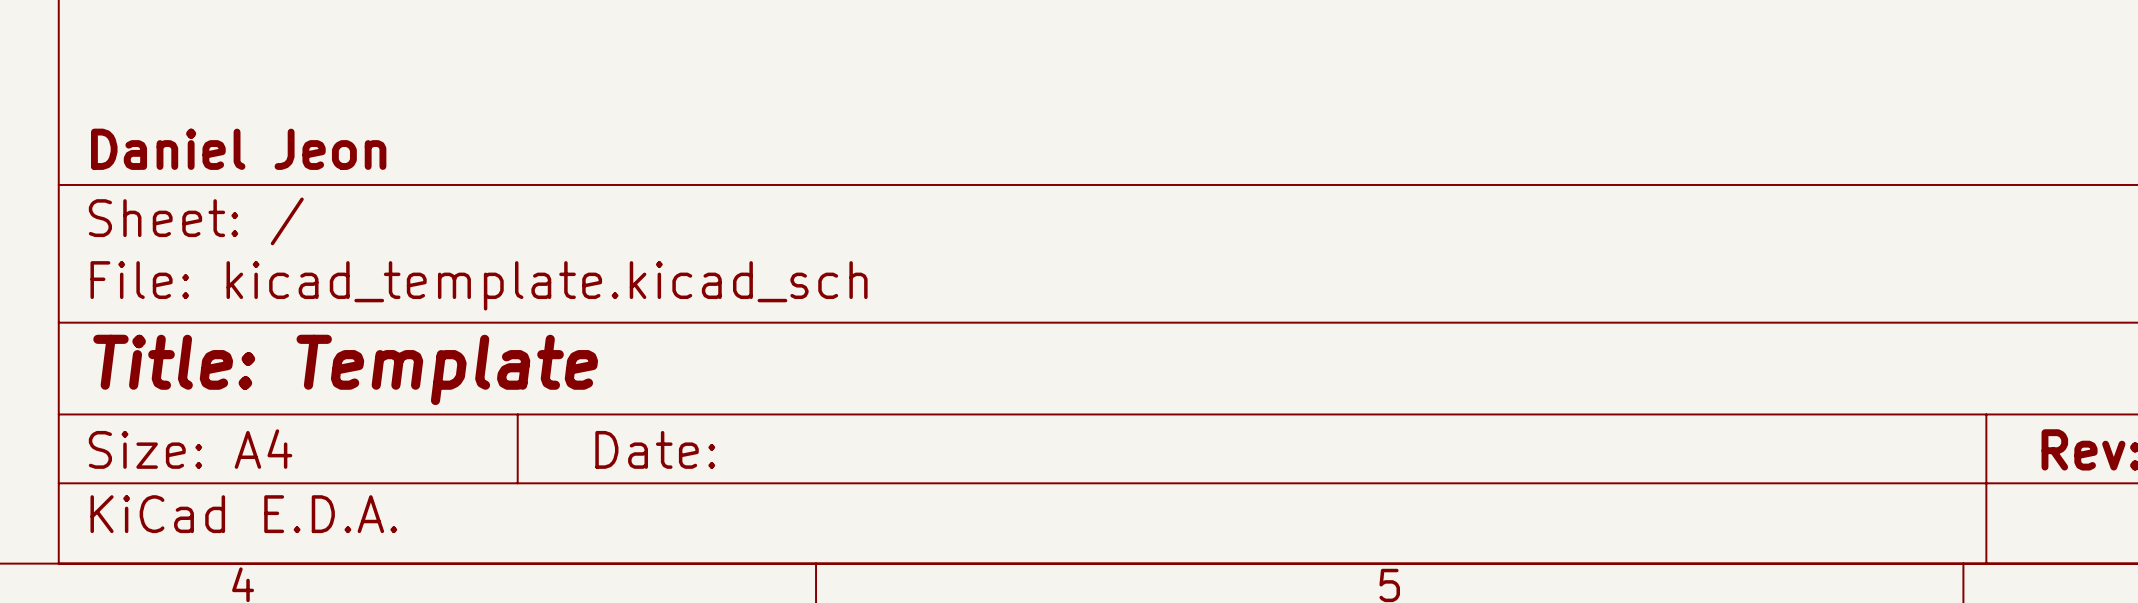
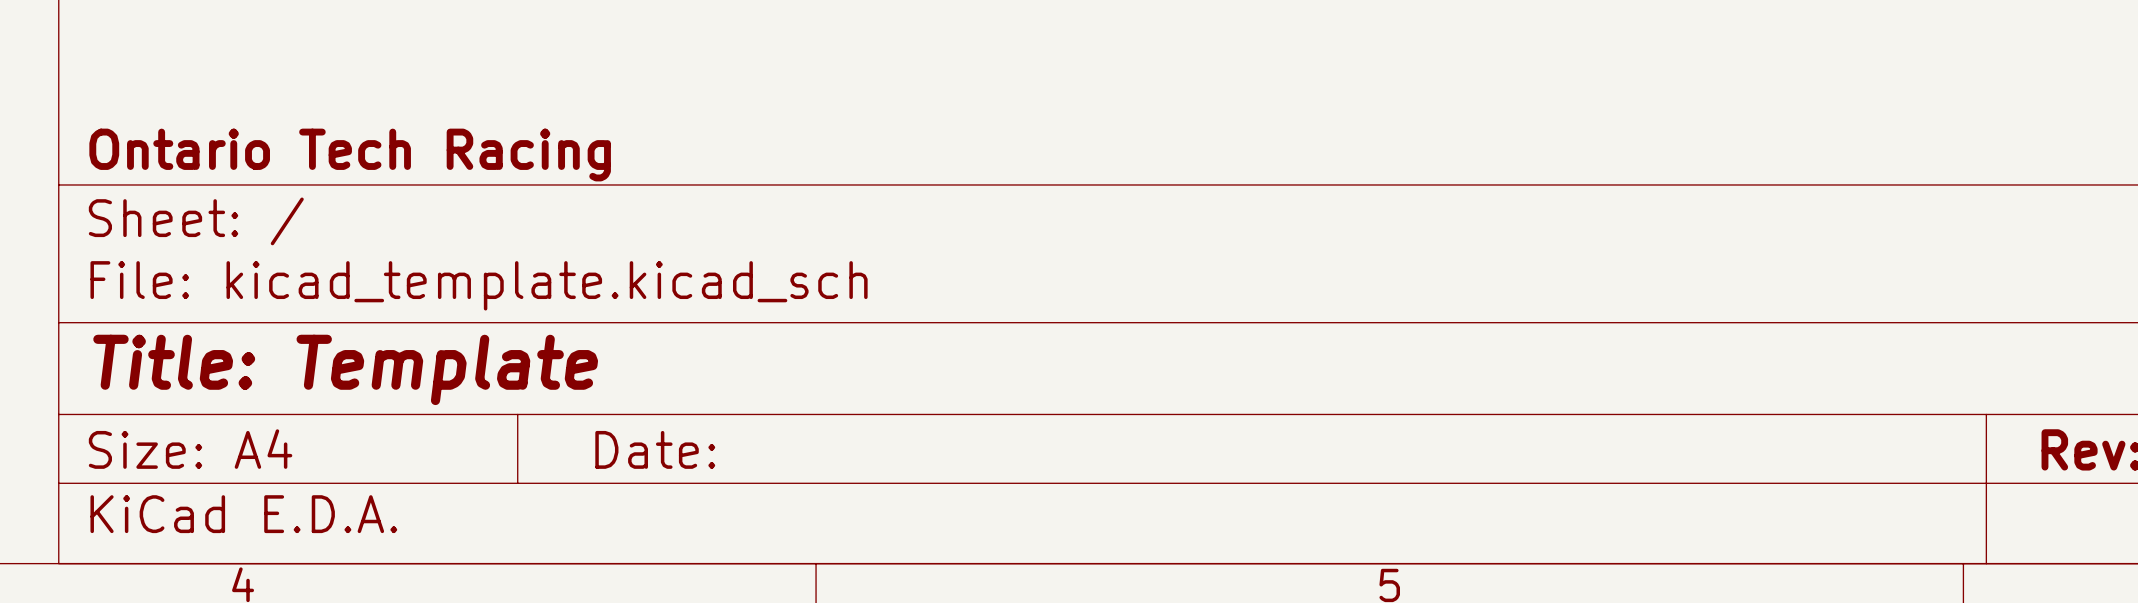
title block: Daniel Jeon (238, 149) -> Ontario Tech Racing (350, 155)

